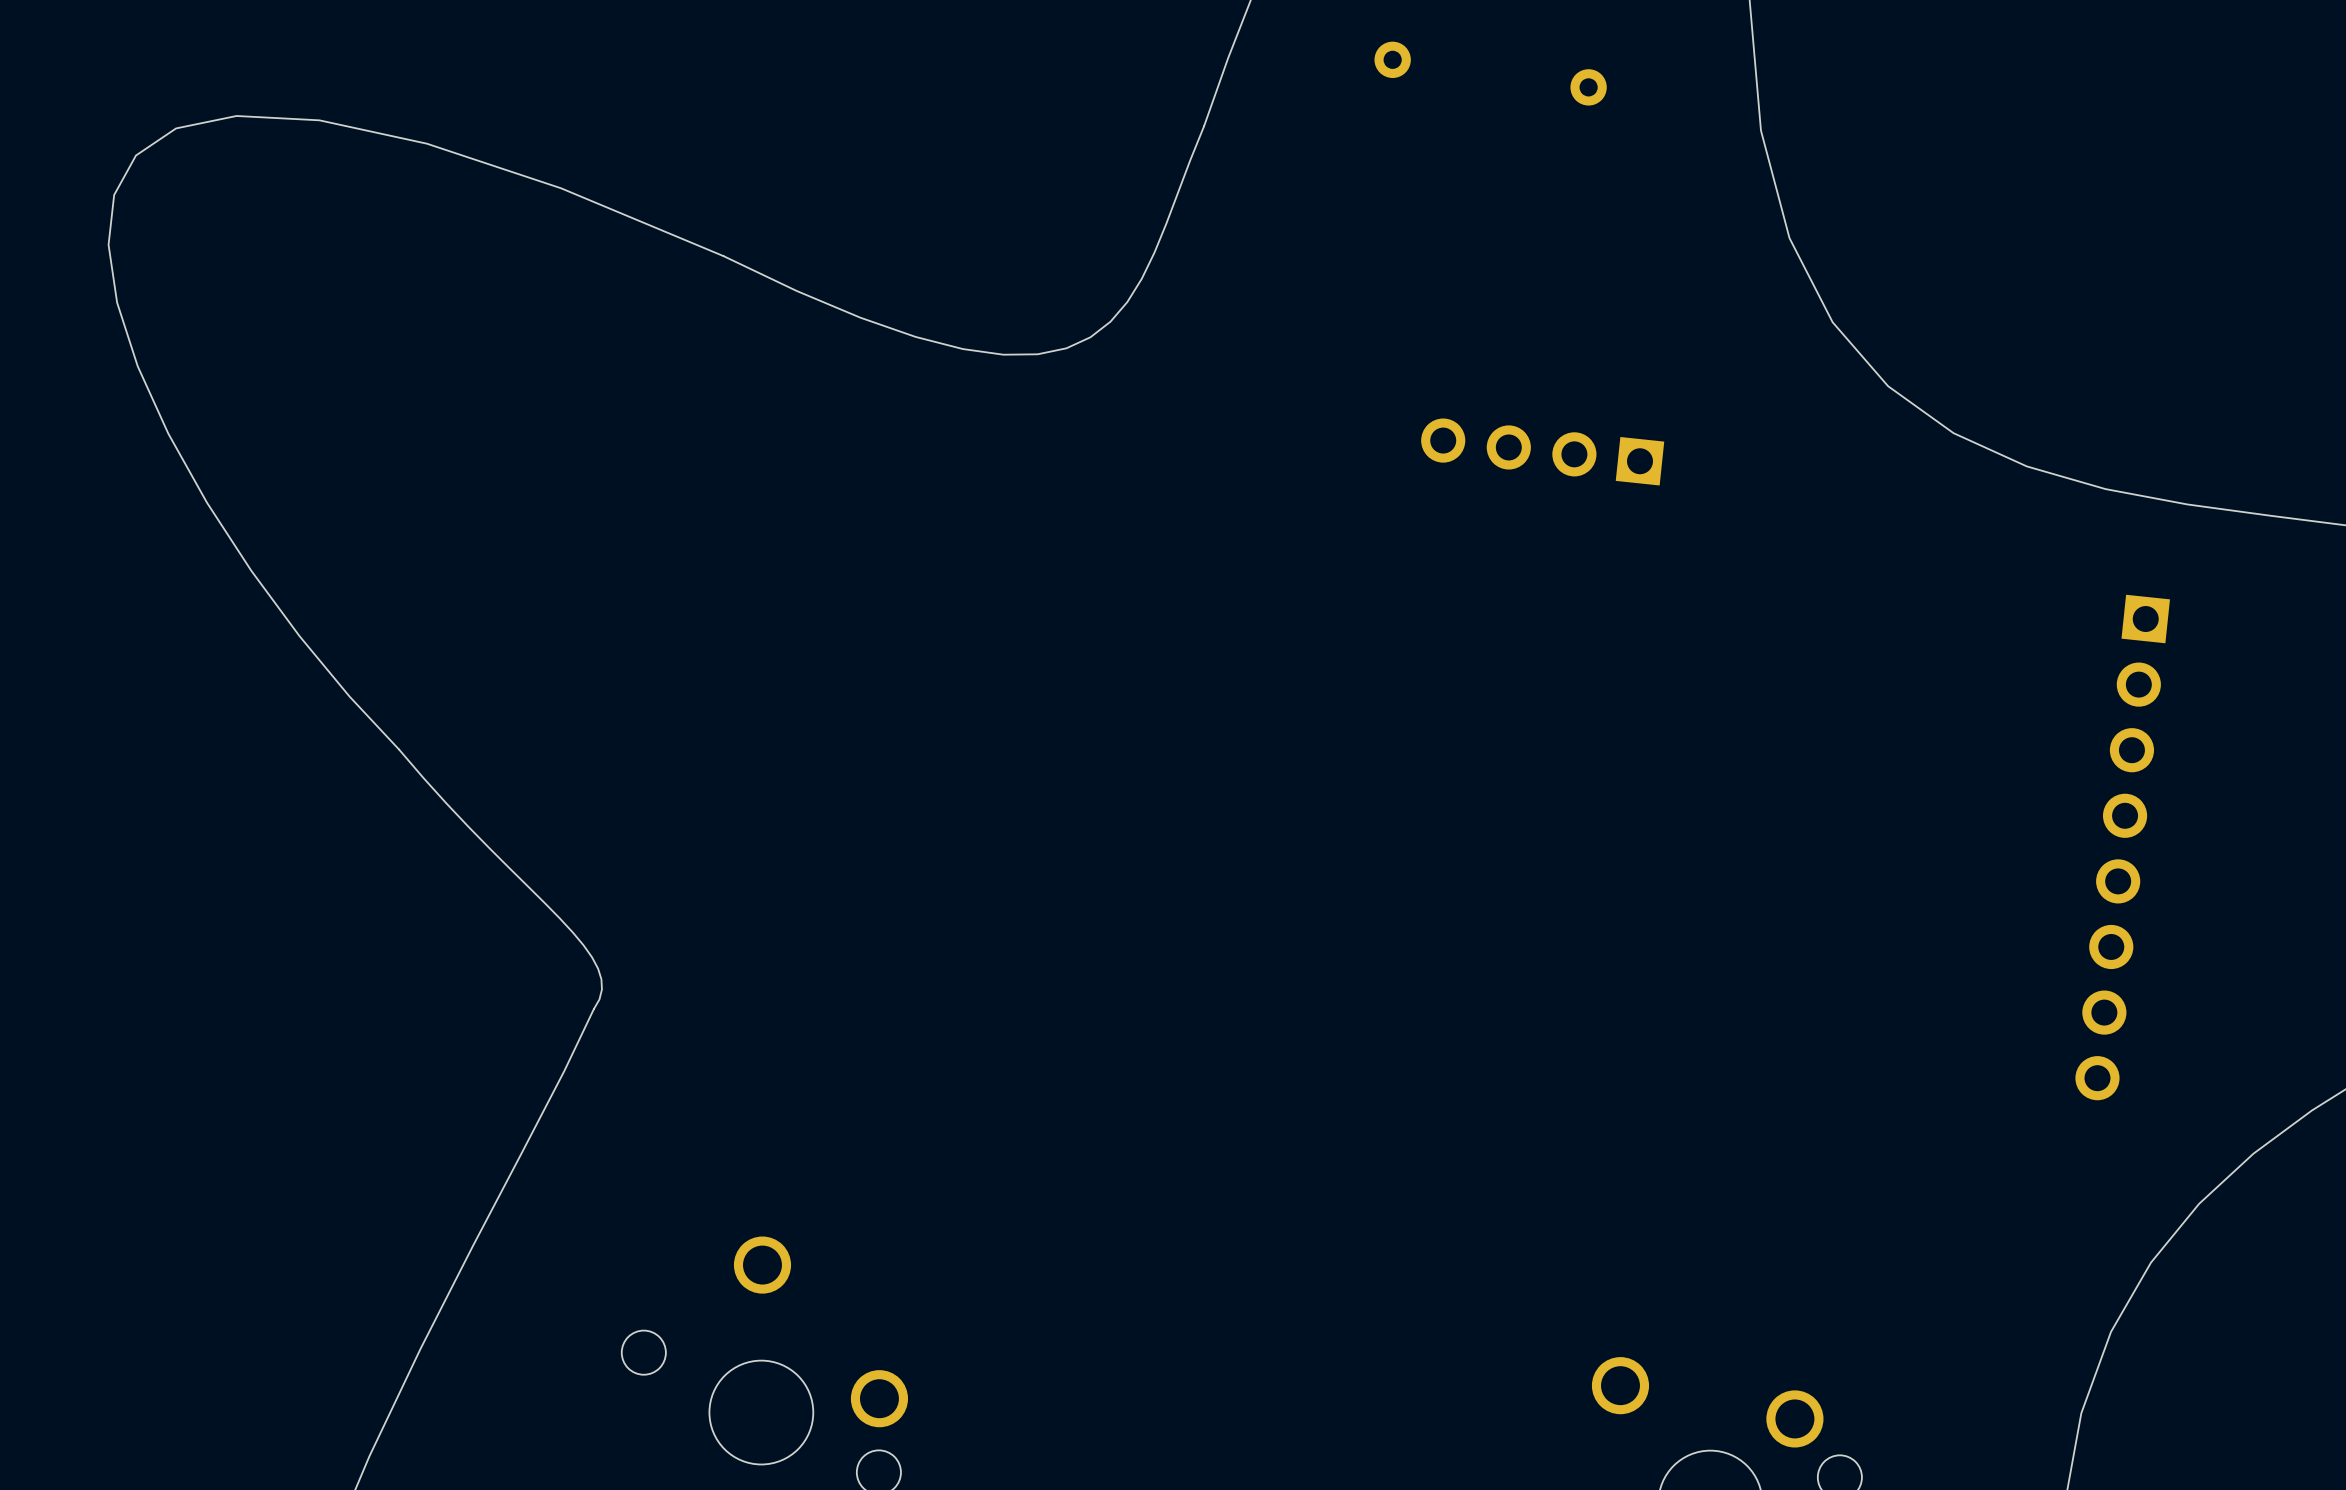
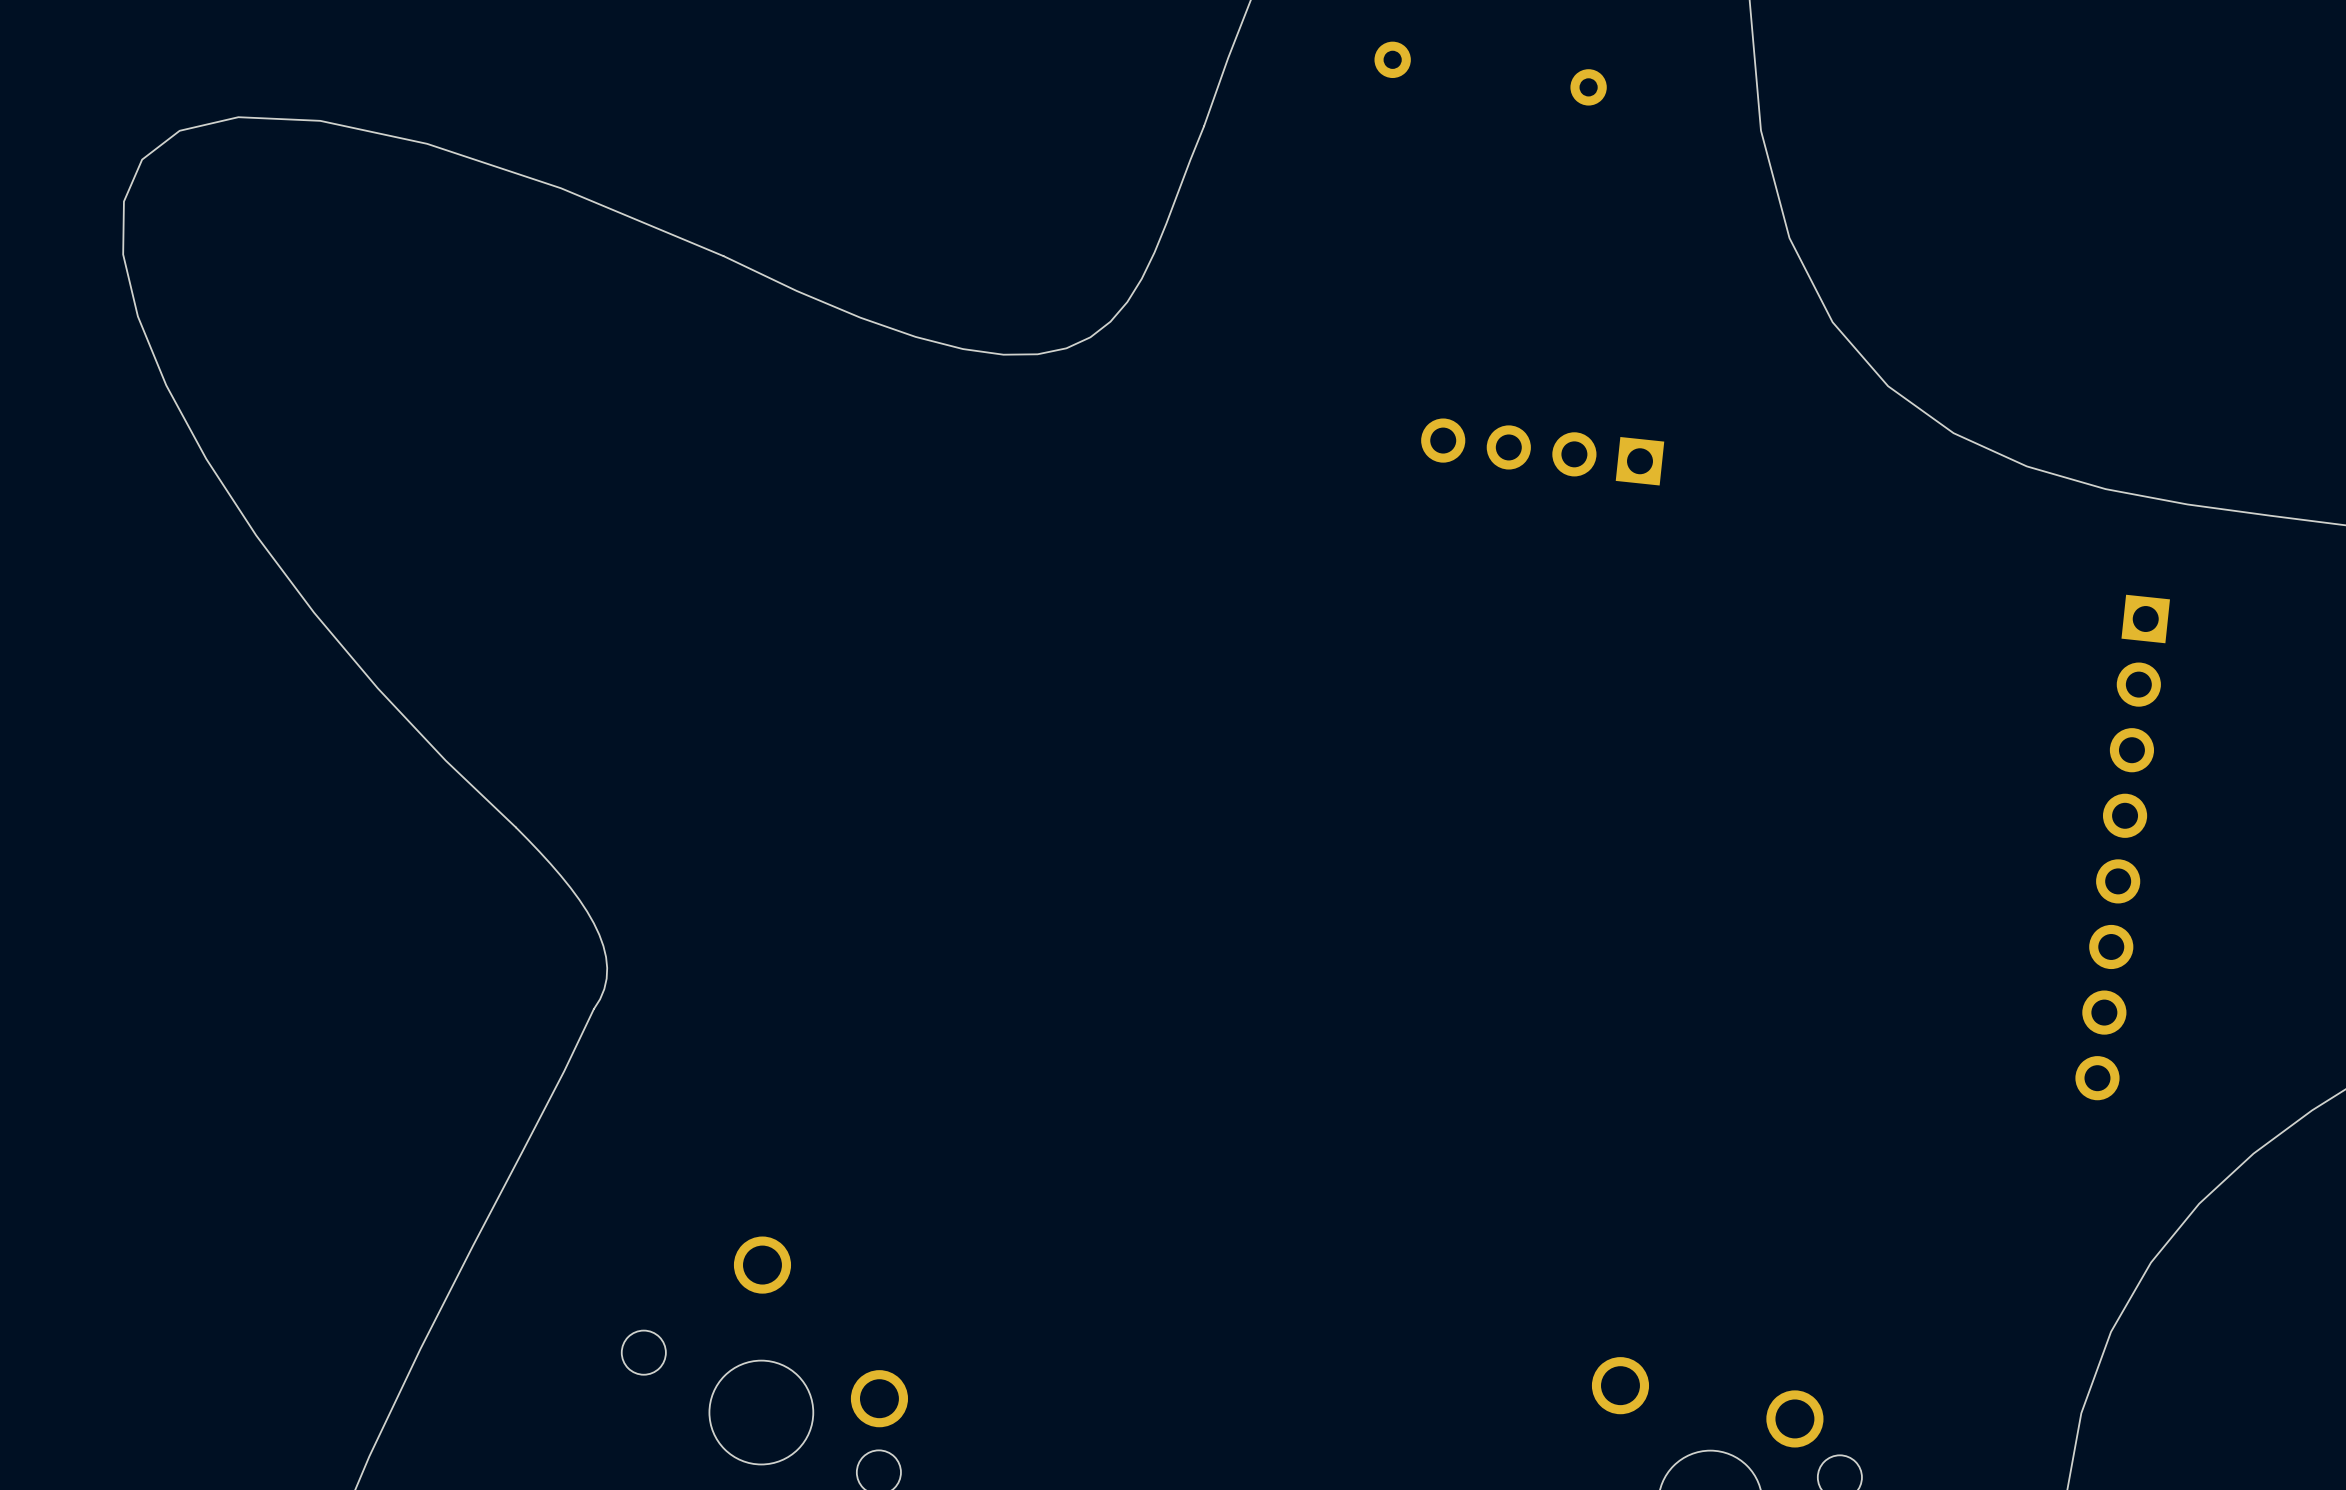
board edge: (723, 256) (560, 188) (426, 143) (319, 120) (236, 115) (176, 128) (135, 155) (114, 195) (108, 244) (117, 302) (137, 366) (168, 433) (206, 502) (251, 570) (299, 636) (349, 696) (446, 803) (559, 918) (583, 945) (598, 968) (601, 979) (601, 989) (599, 999) (593, 1009) -> (723, 256) (560, 188) (427, 143) (320, 120) (238, 117) (179, 130) (142, 159) (123, 201) (123, 254) (137, 316) (166, 385) (206, 459) (256, 535) (314, 612) (377, 688) (445, 760) (539, 851) (579, 899) (599, 934) (606, 957) (606, 978) (604, 989) (593, 1009)

